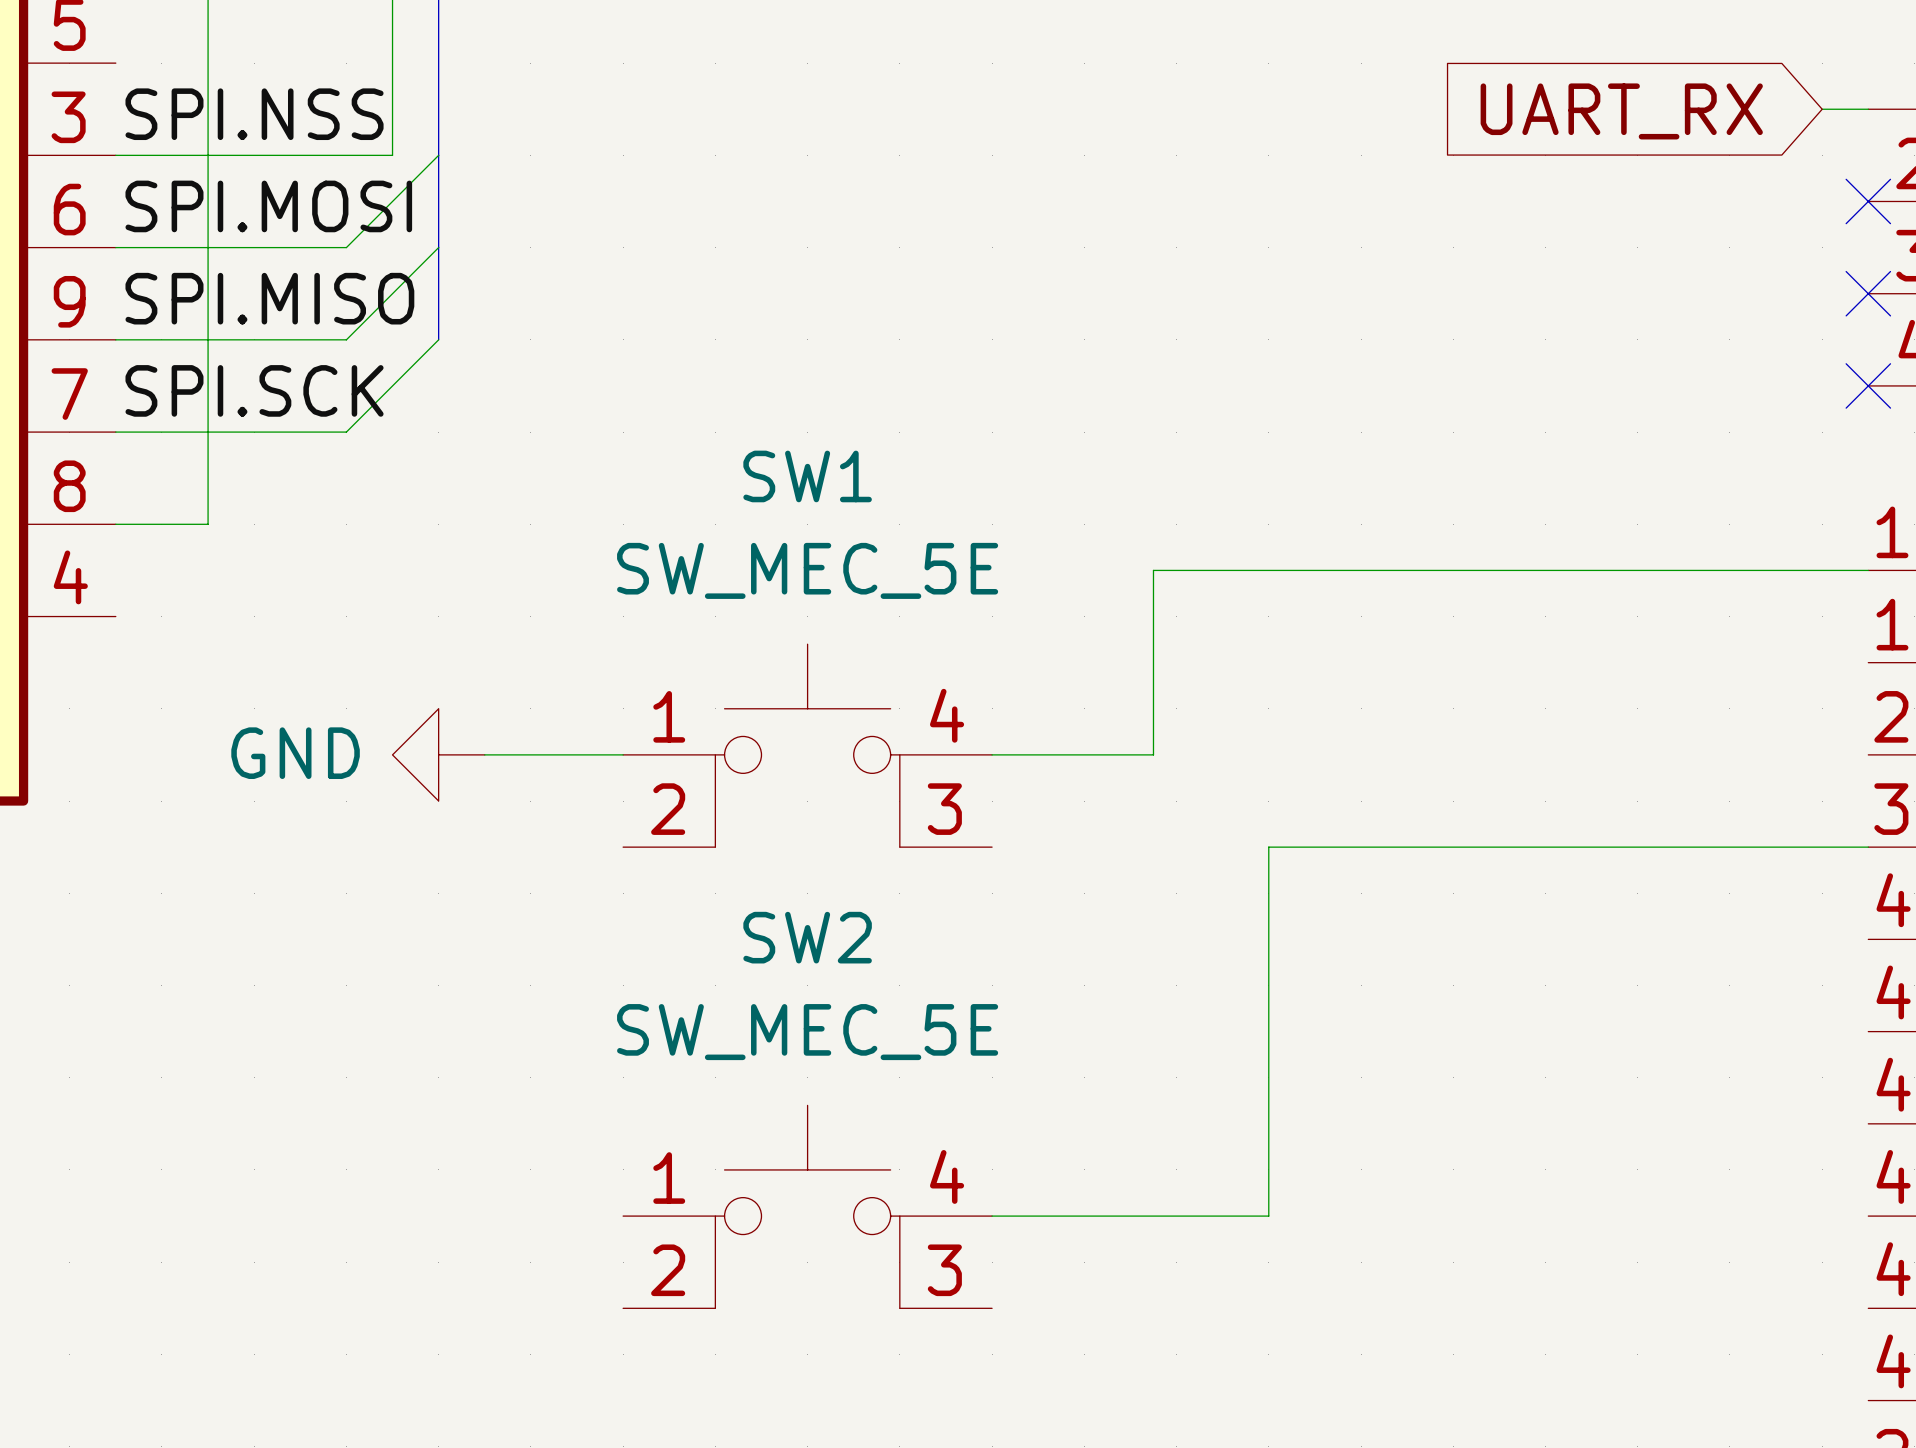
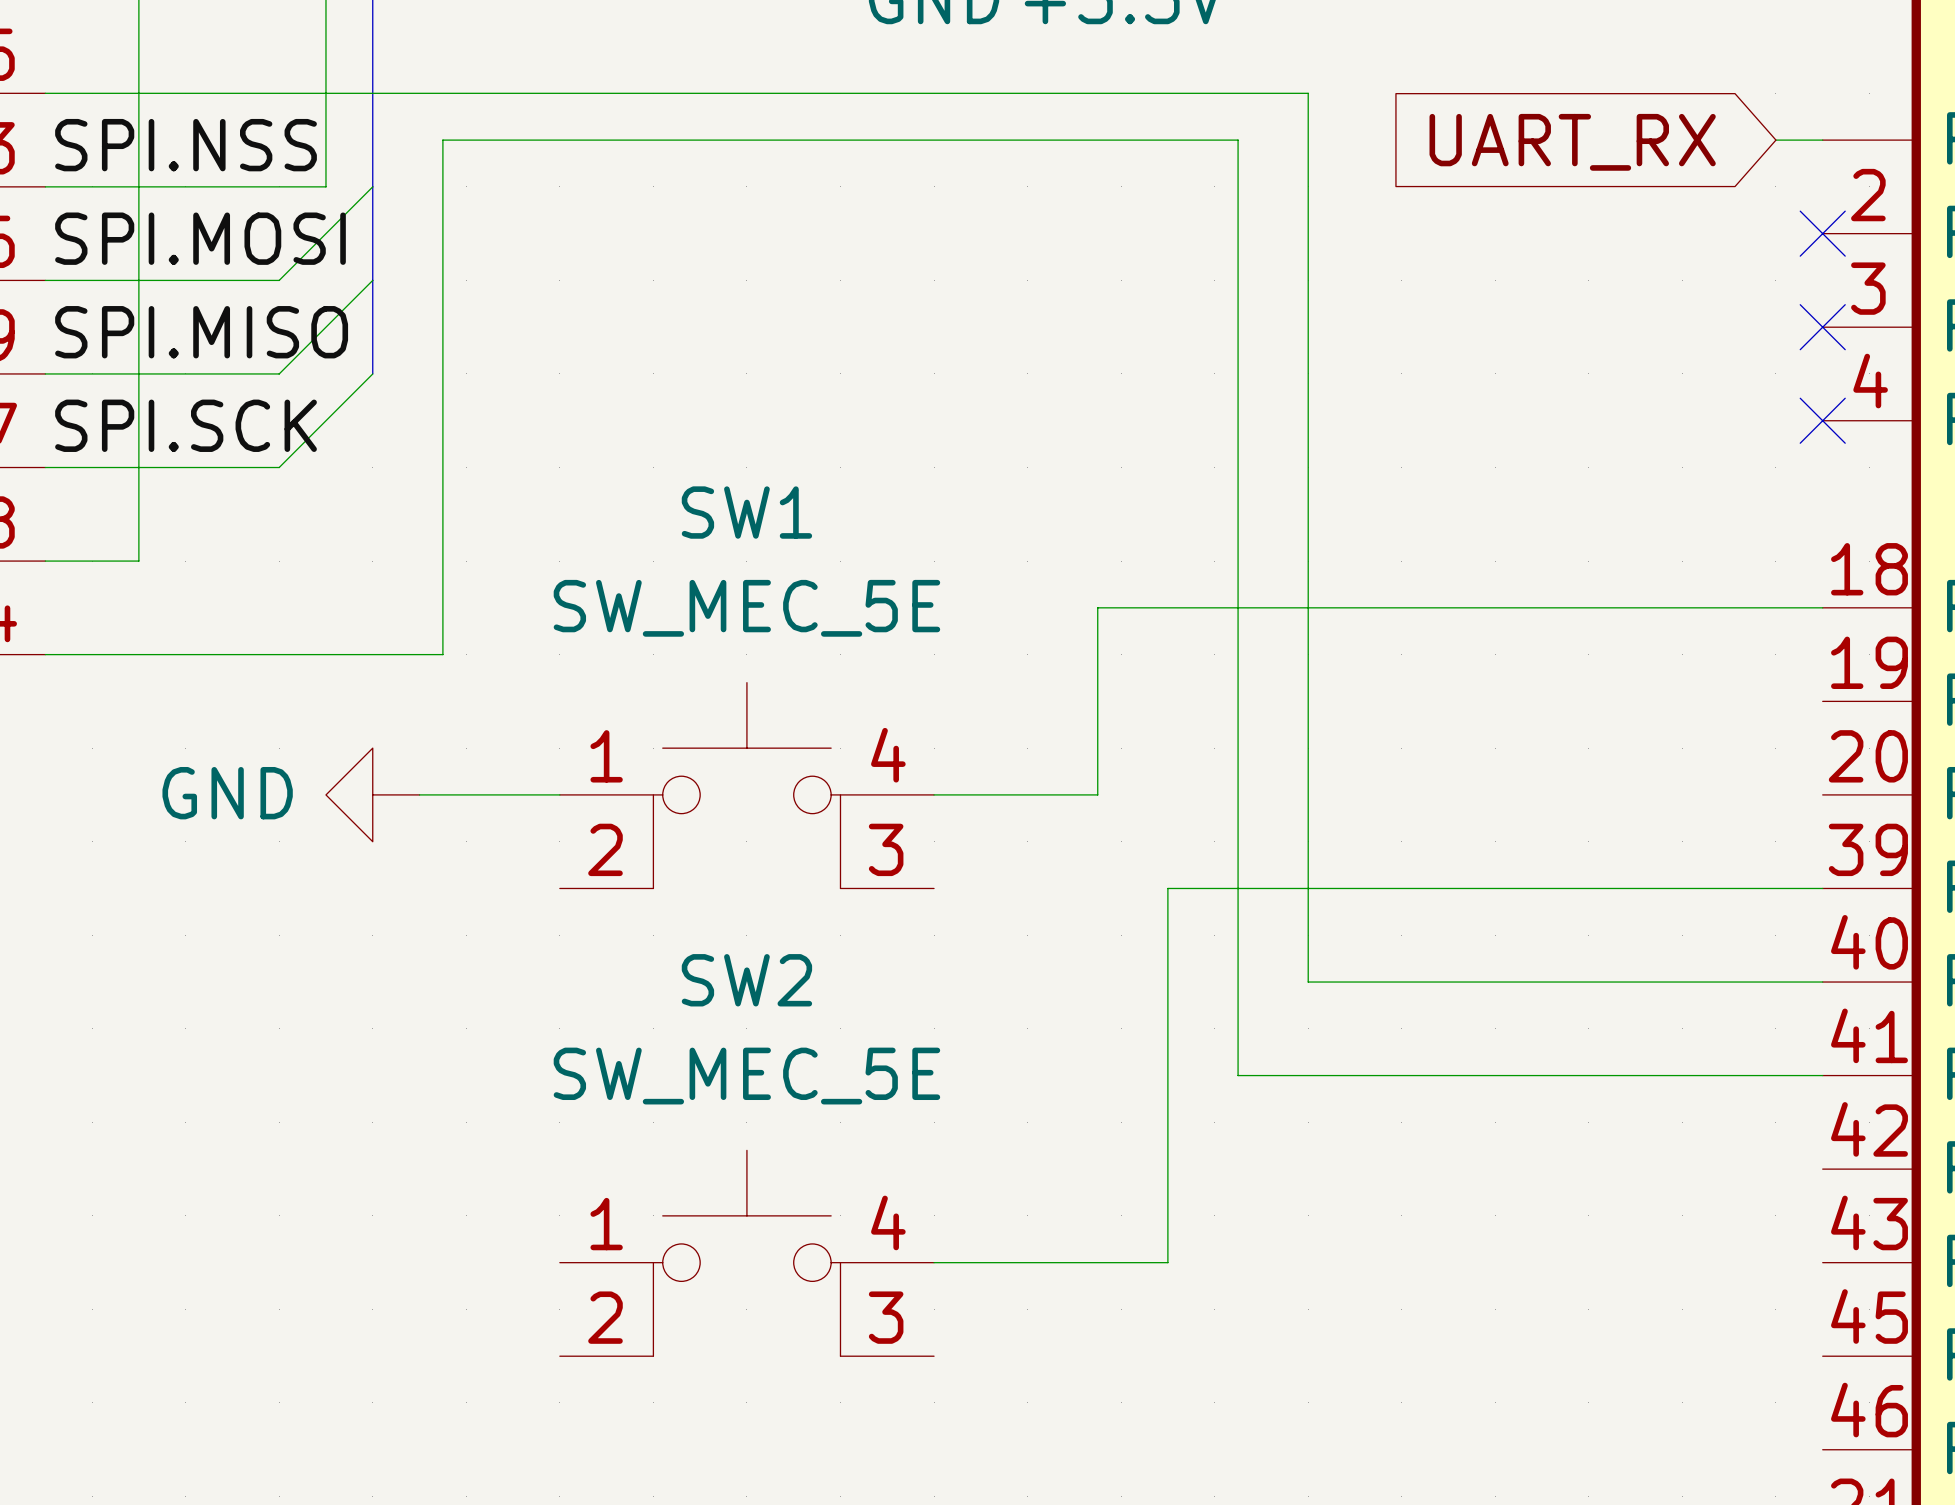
wire: none -> (45, 93) (1308, 93) (1308, 982) (1822, 982)
wire: none -> (45, 654) (442, 654) (442, 140) (1238, 140) (1238, 1075) (1822, 1075)
wire: (1268, 847) (1268, 1216) (1222, 1216) -> (1214, 888) (1167, 888) (1167, 1262)

